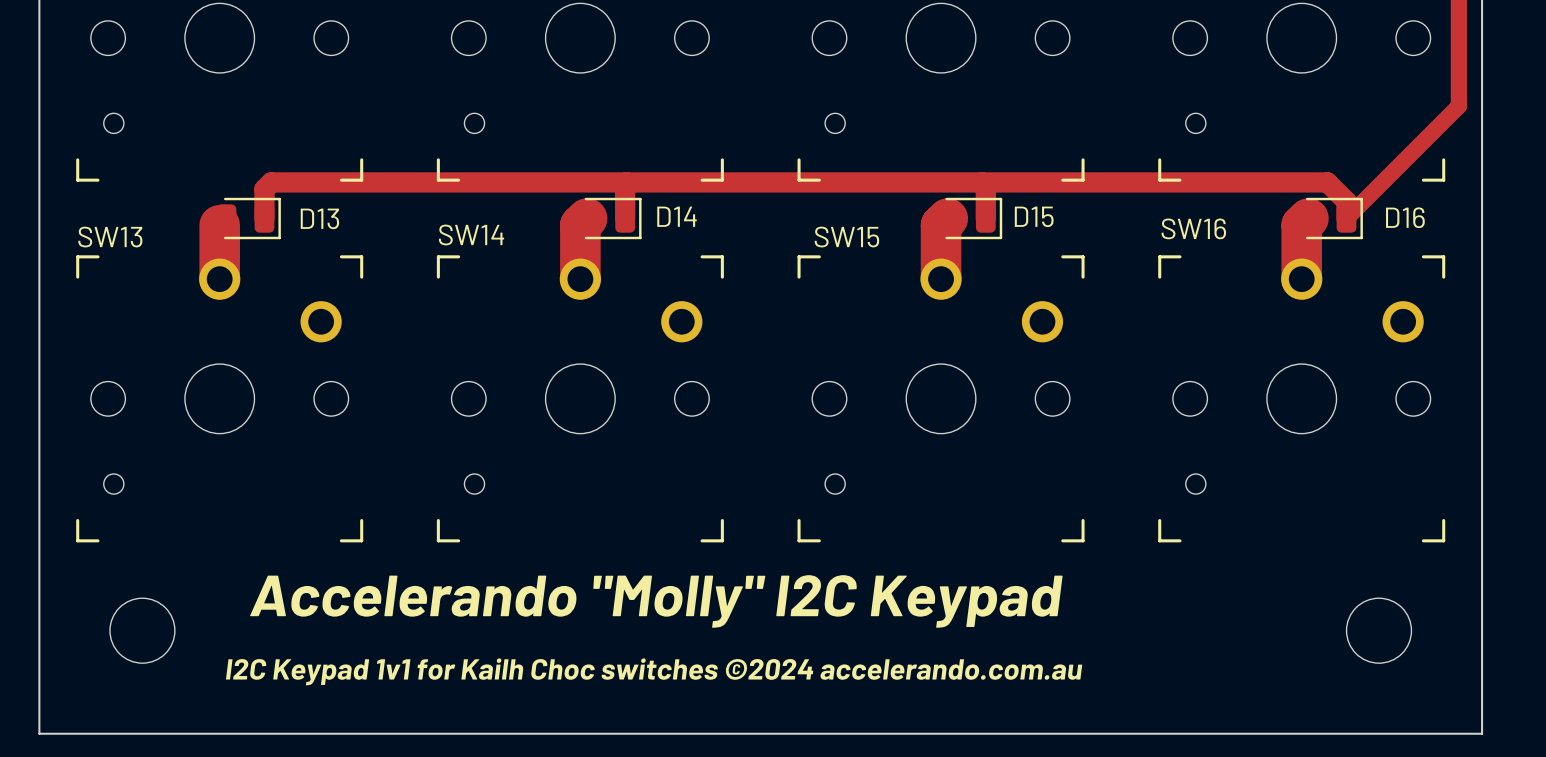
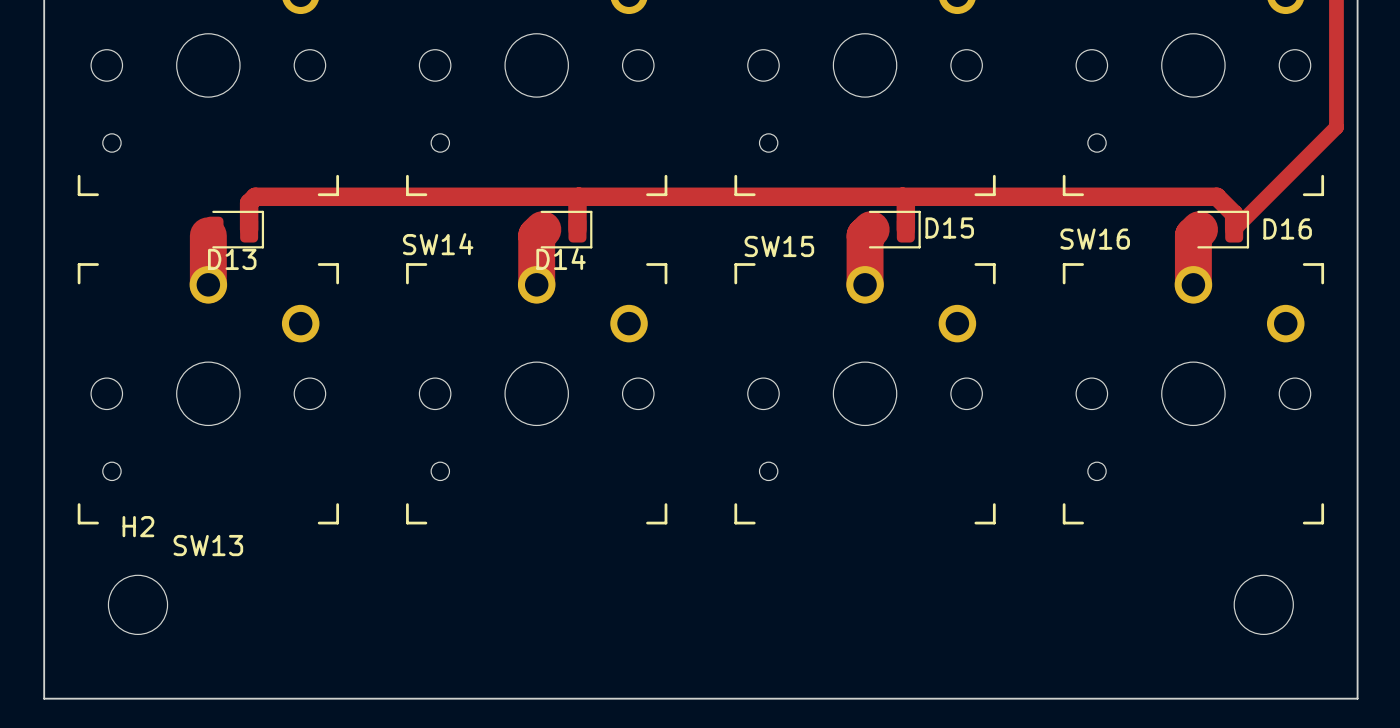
D14 name position: D14 (677, 216) -> D14 (561, 258)
D13 name position: D13 (319, 218) -> D13 (232, 259)
SW13 name position: SW13 (110, 237) -> SW13 (208, 545)
H2 name: none -> H2 (138, 526)
text: Accelerando "Molly" I2C Keypad (656, 601) -> none
text: I2C Keypad 1v1 for Kailh Choc switches ©2024 accelerando.com.au (654, 671) -> none

